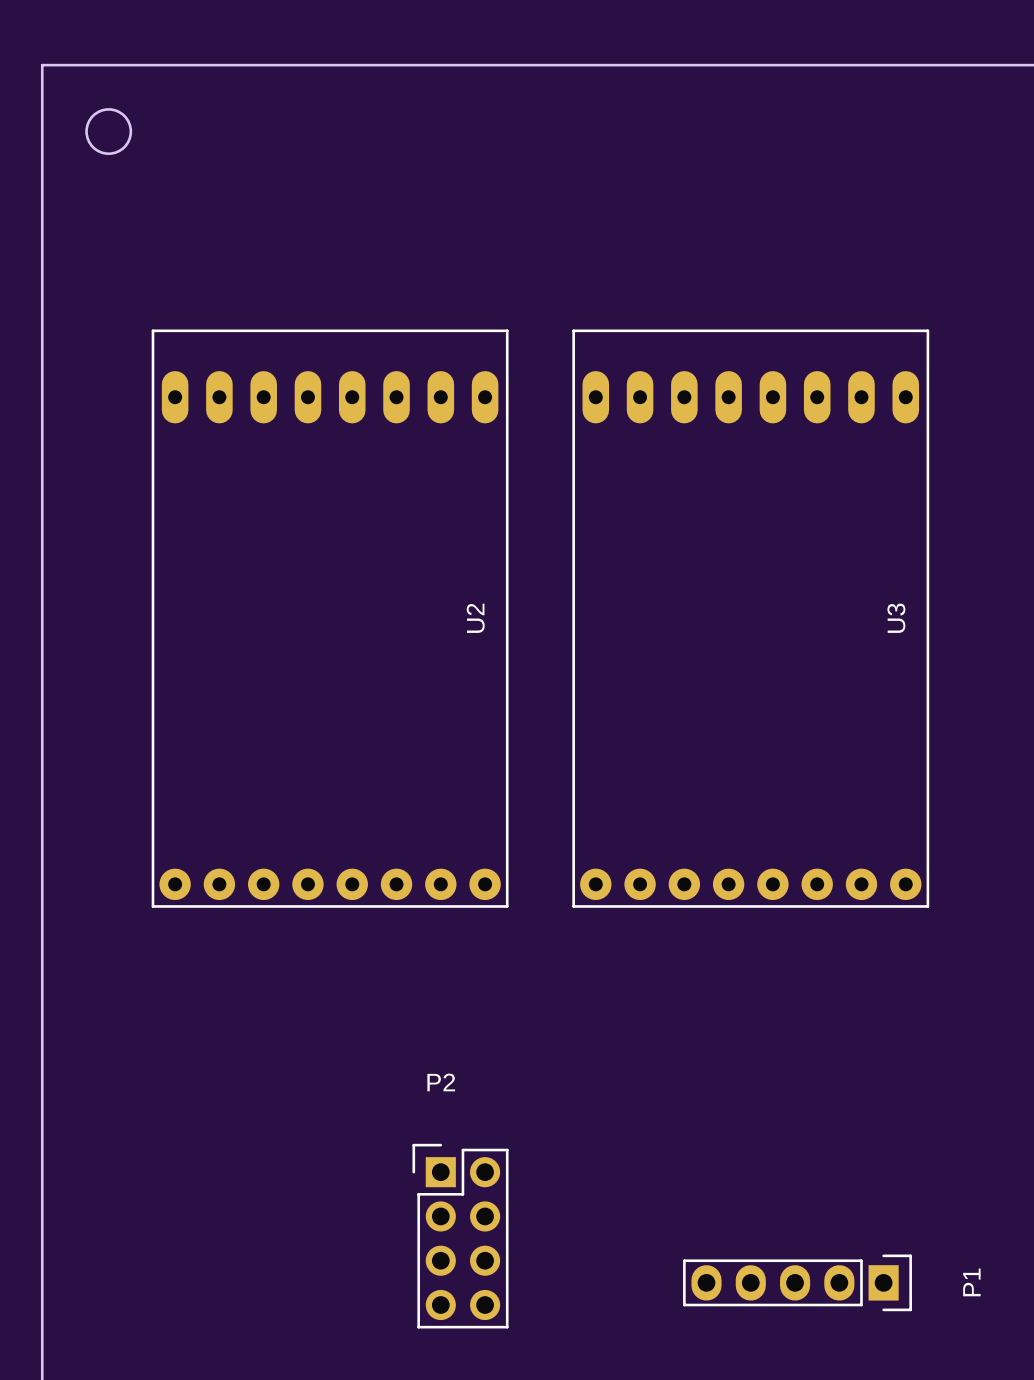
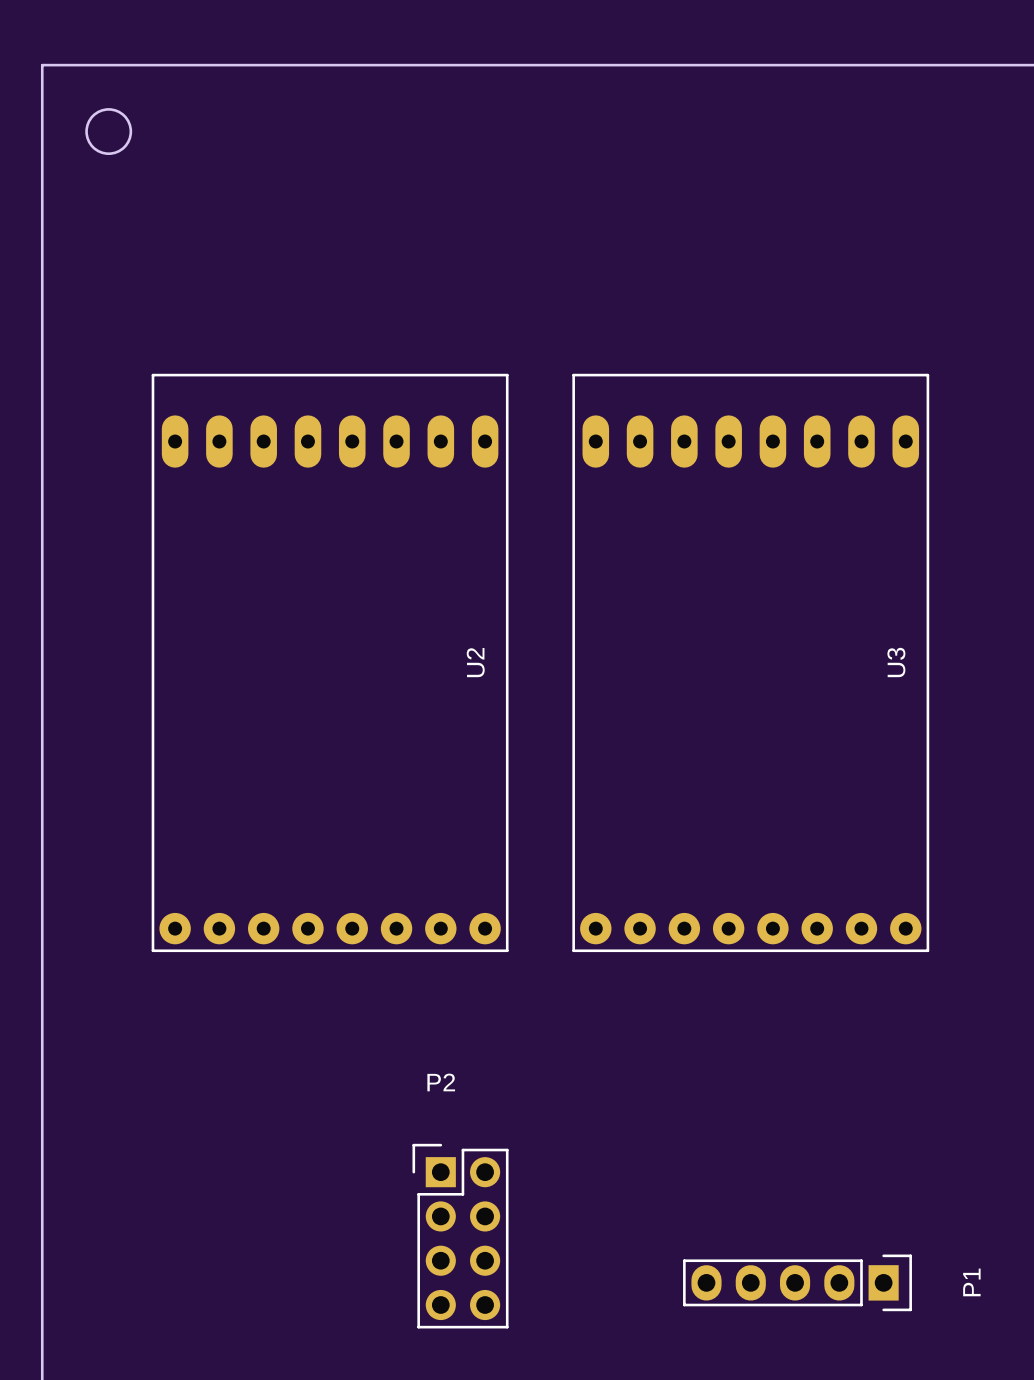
U2 position: (330, 618) -> (330, 662)
U3 position: (750, 618) -> (750, 662)

